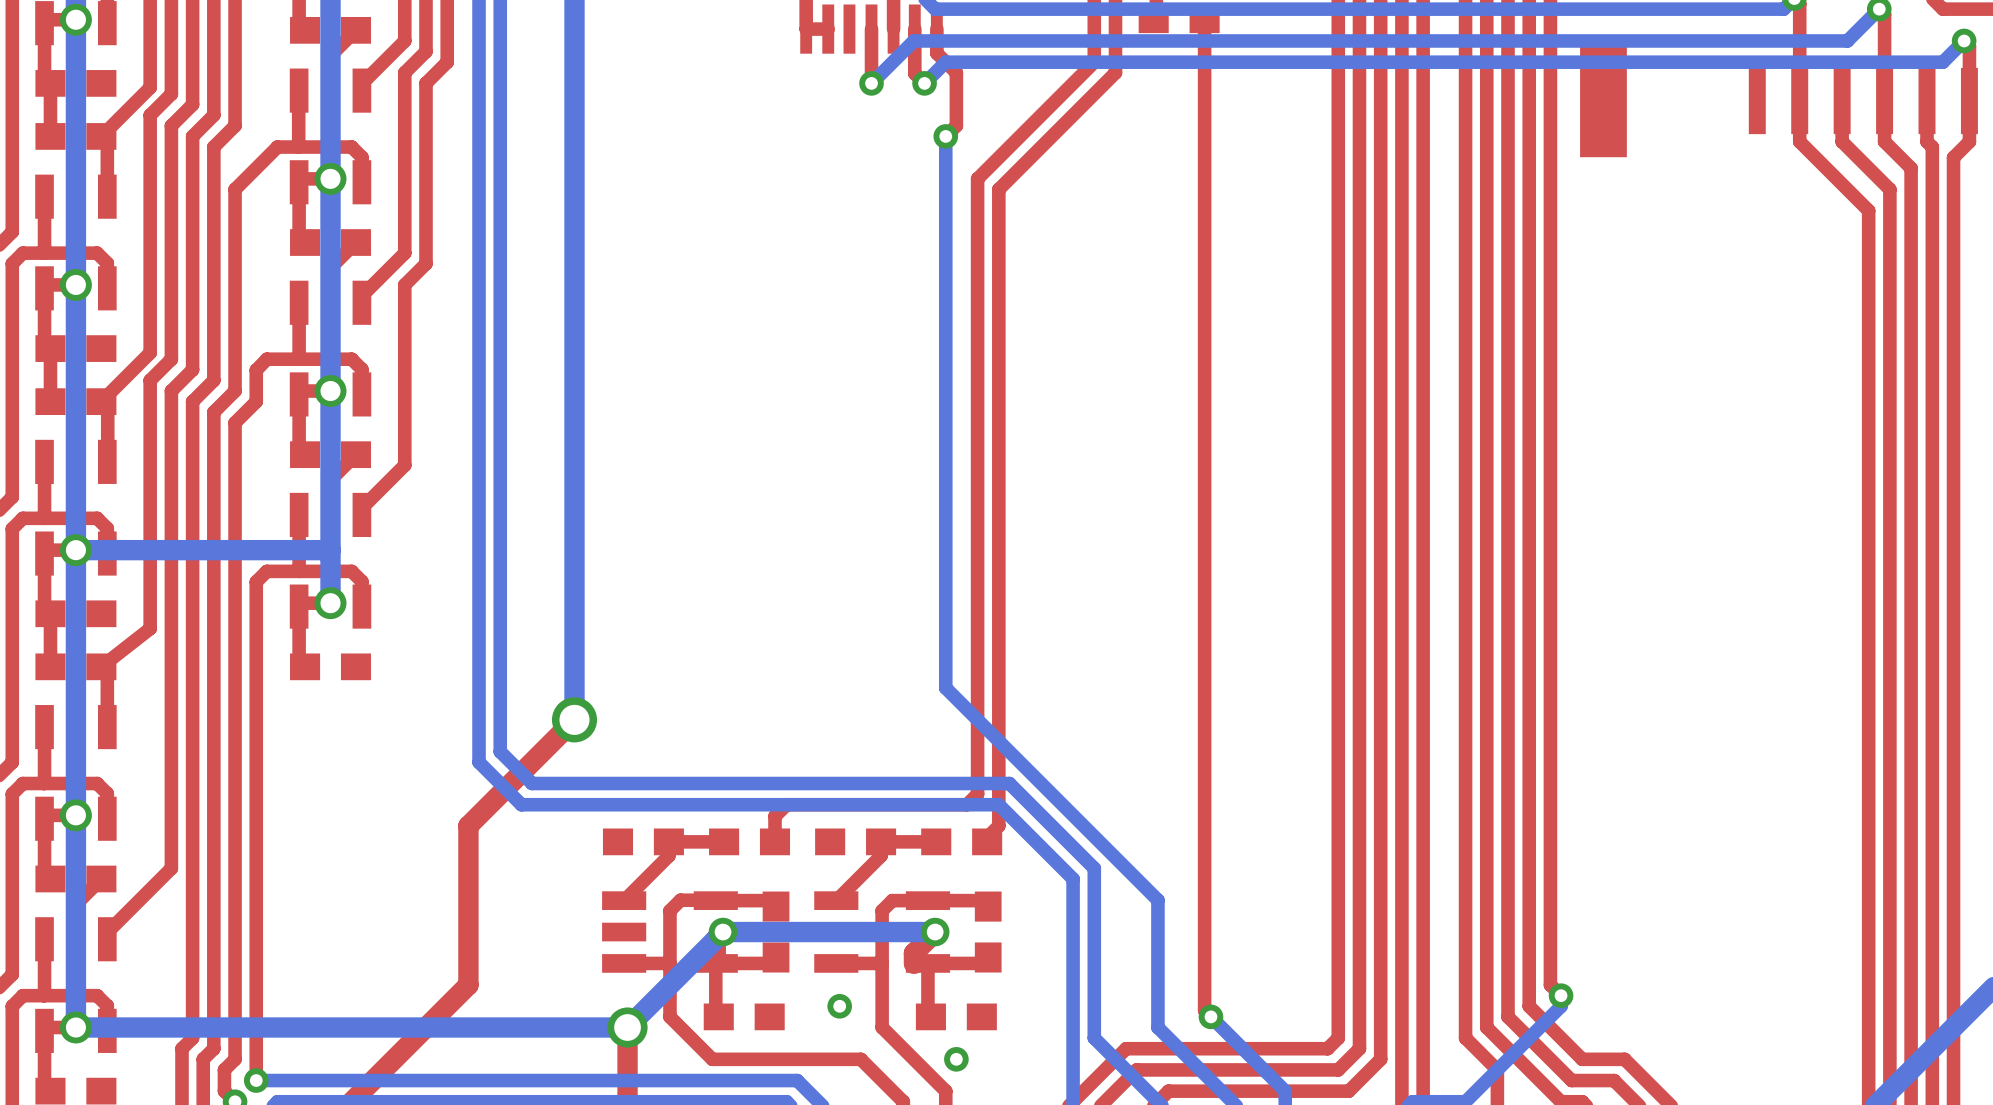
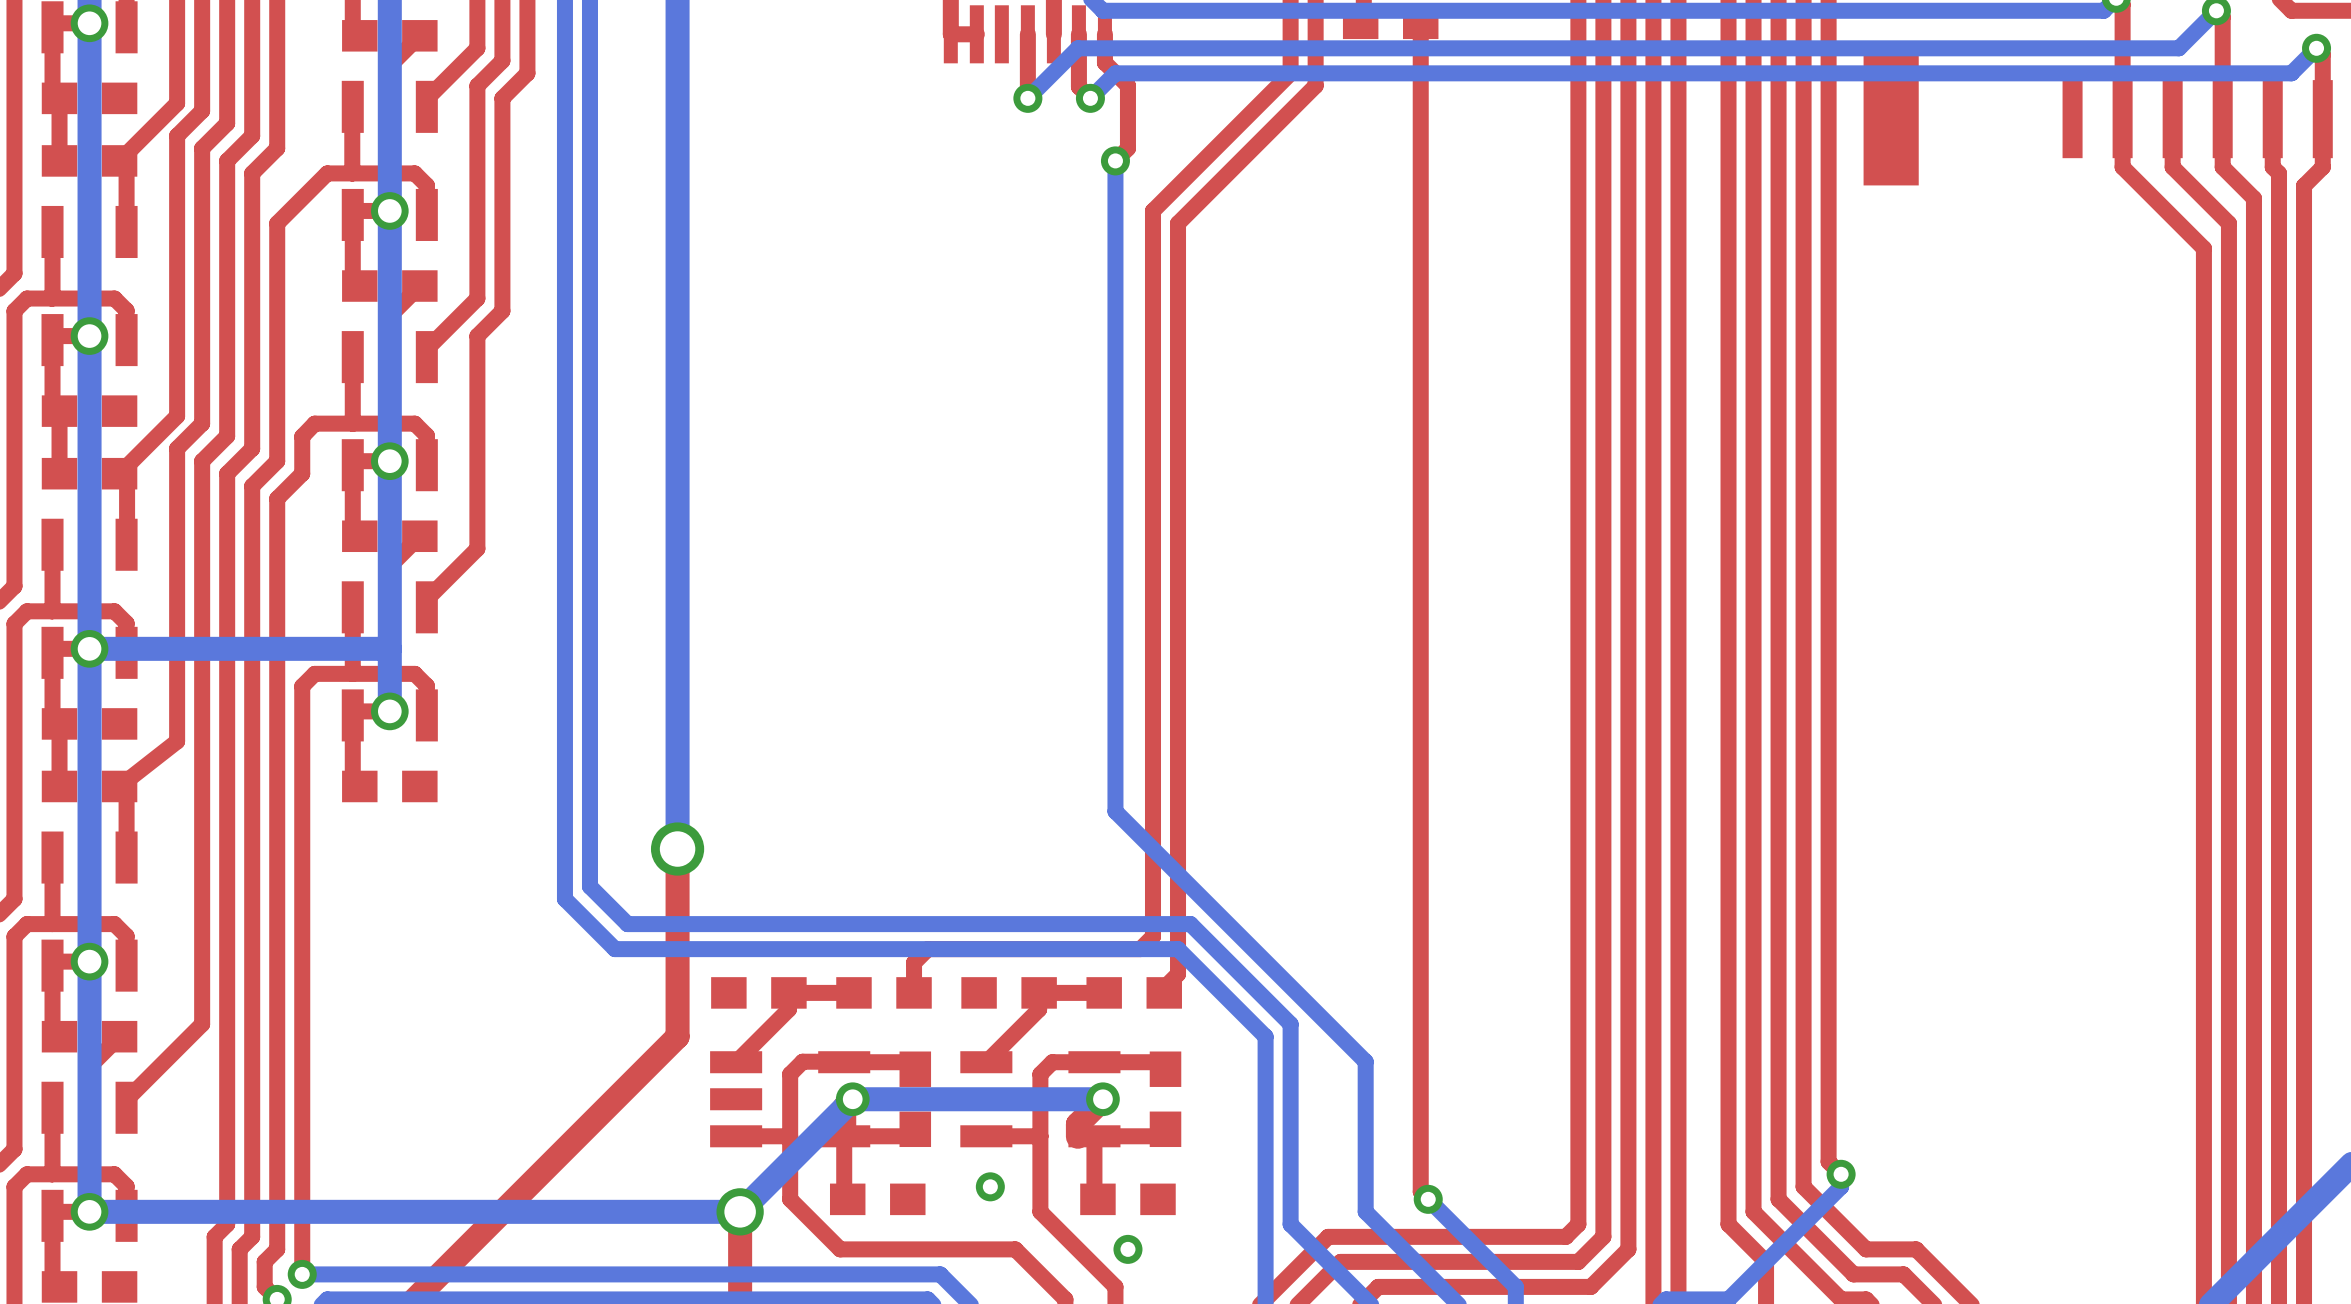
top track: (574, 719) (468, 825) (468, 985) -> (677, 849) (677, 1036) (552, 1161)

